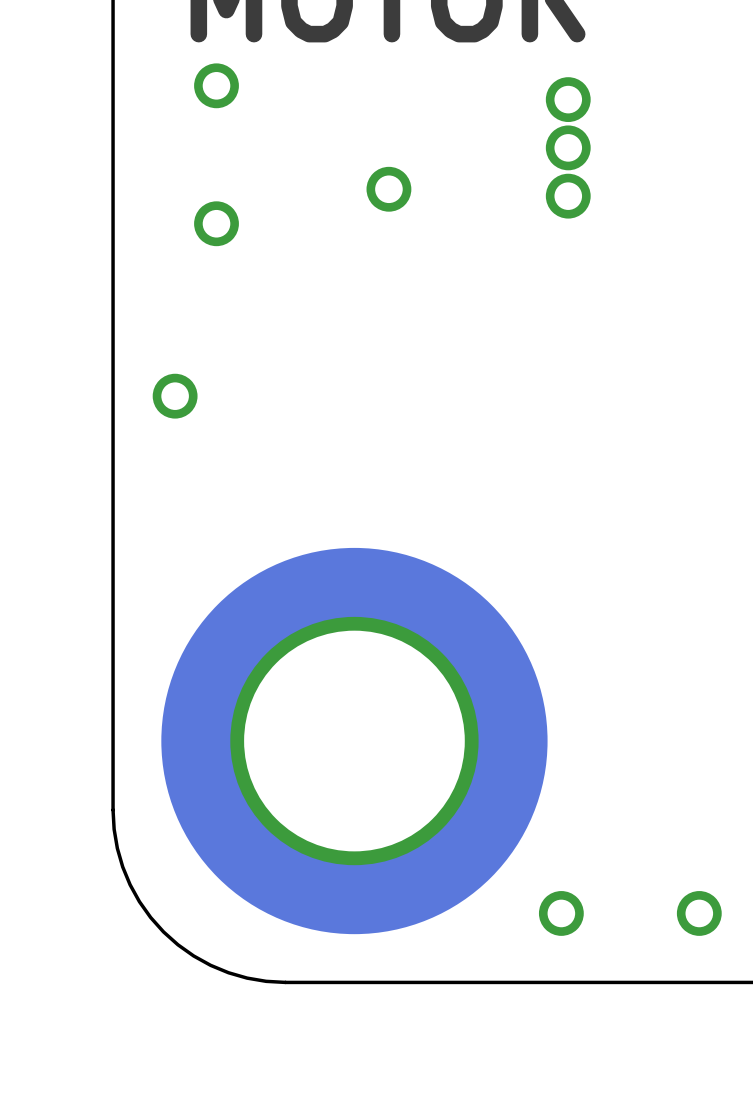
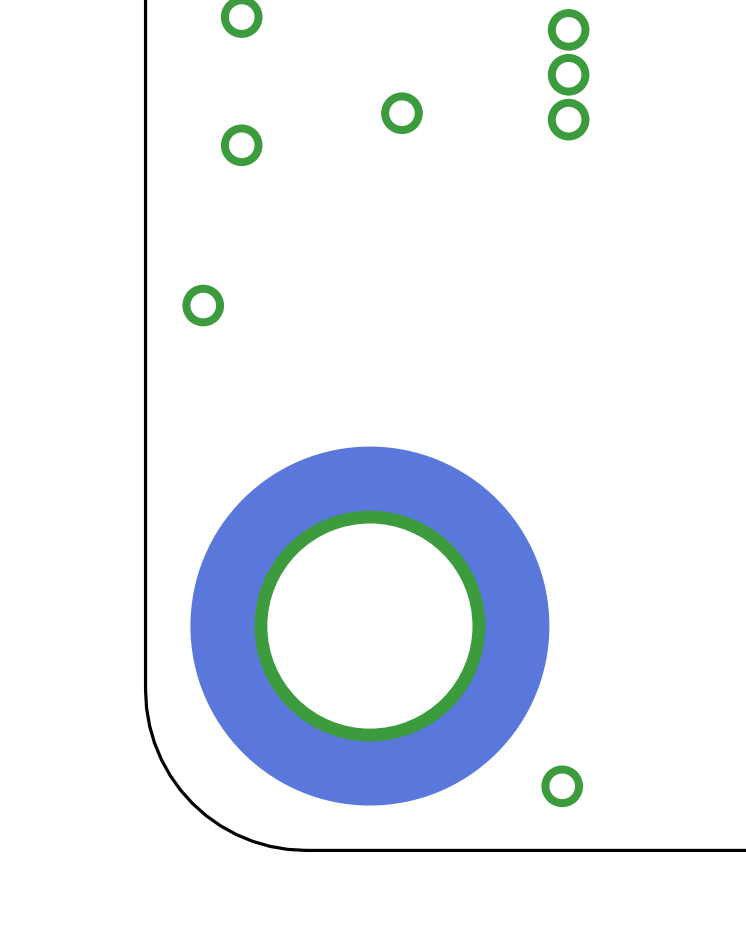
via: (699, 913) -> none

